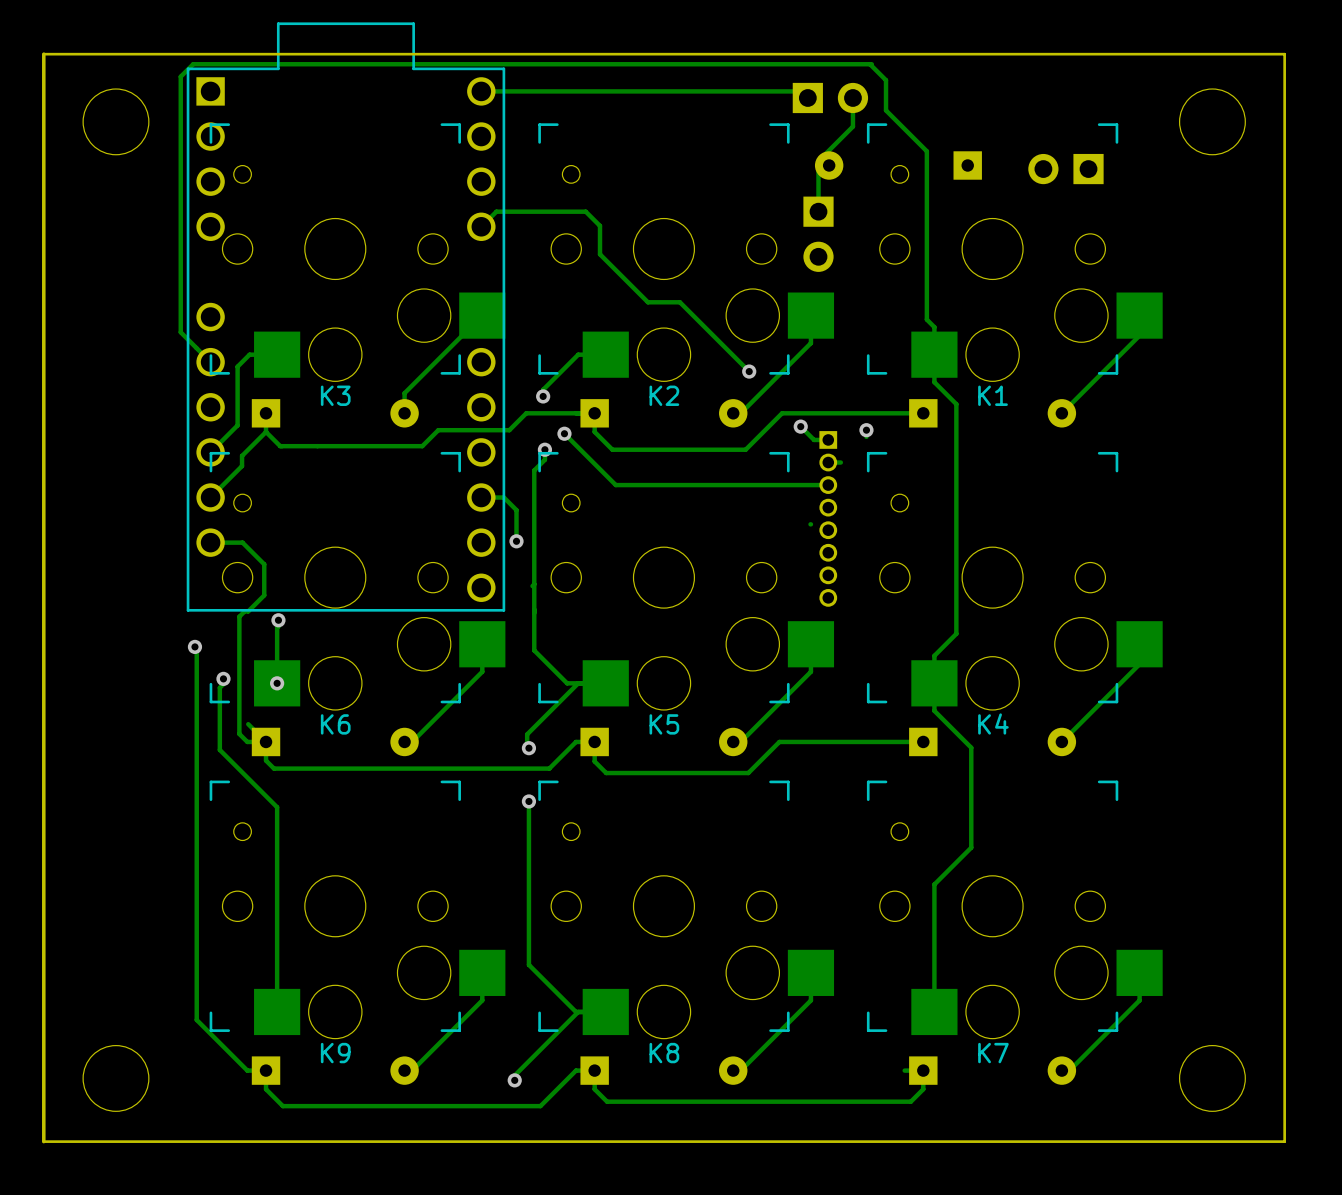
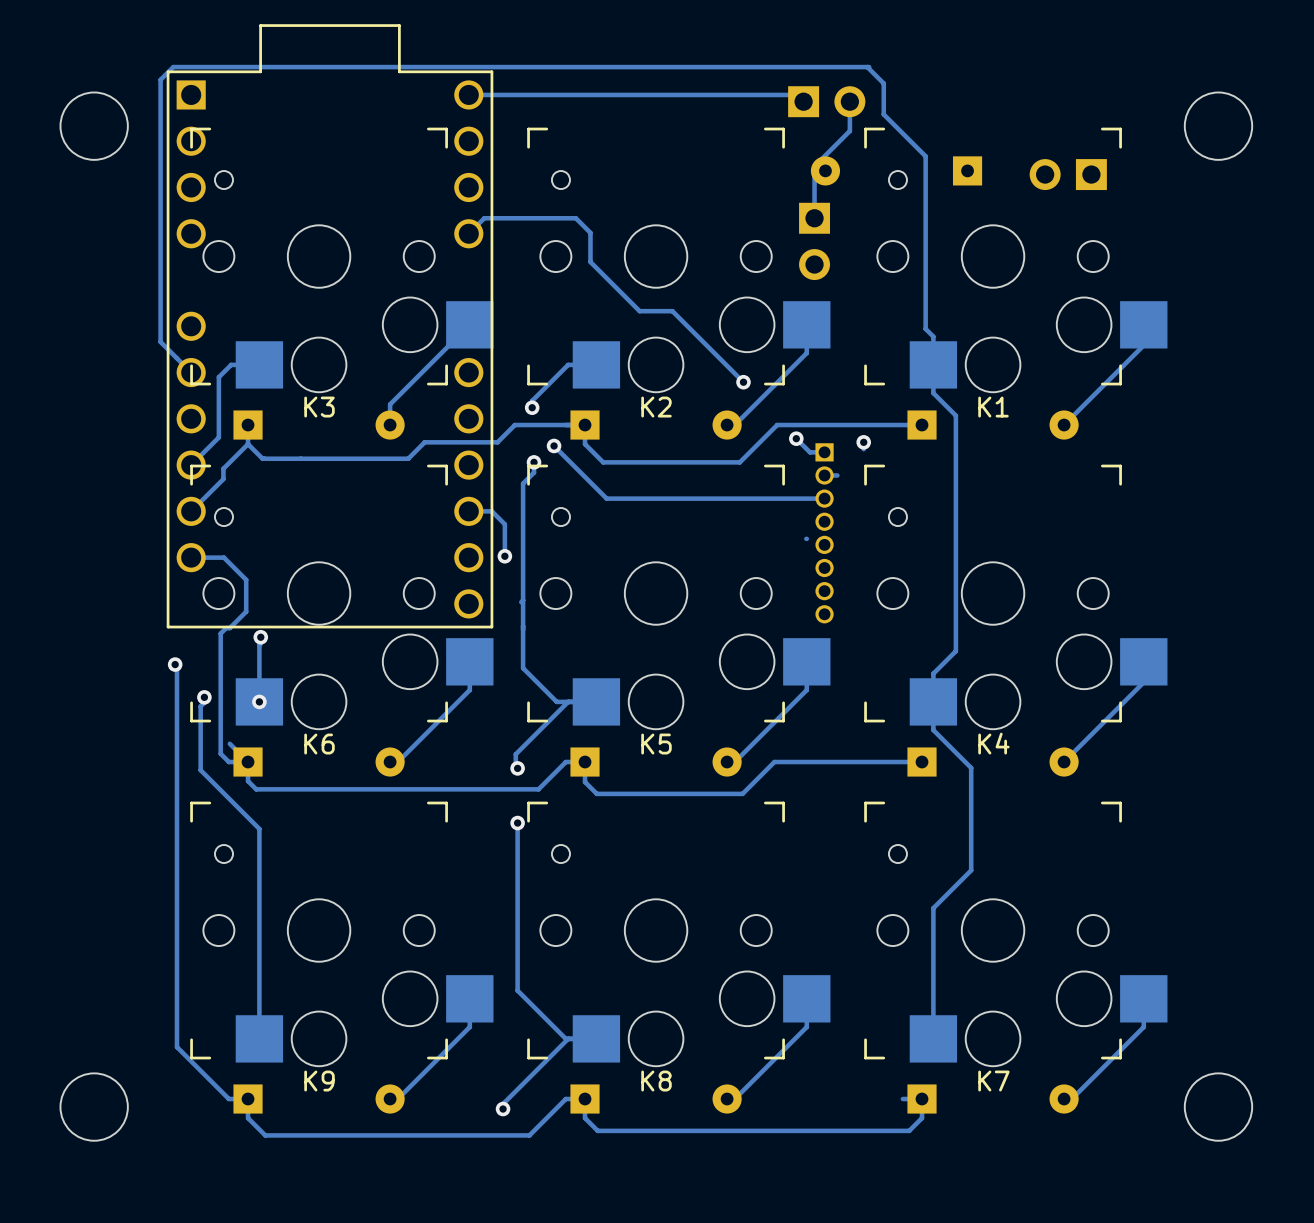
board edge: (1284, 54) (1284, 1141) (43, 1141) (43, 54) (1284, 54) -> none

